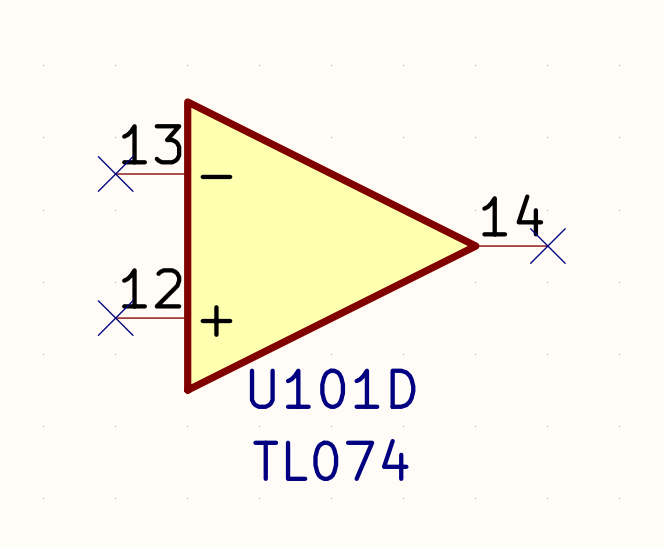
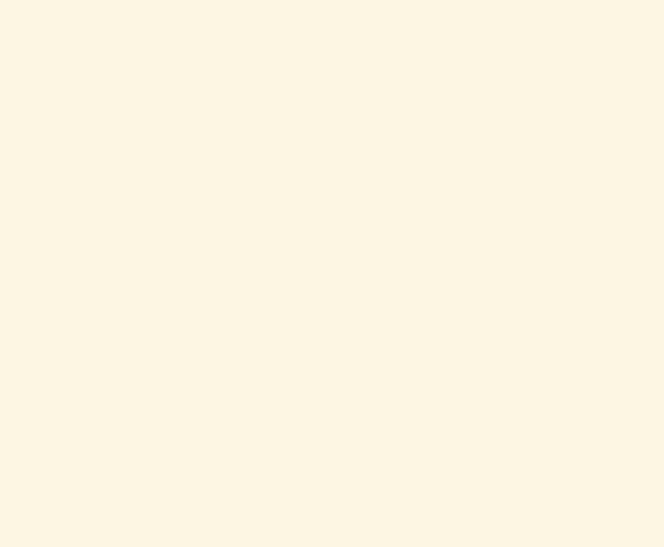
no-connect mark: (115, 174) -> none
U101D: TL074 (331, 246) -> none
no-connect mark: (547, 246) -> none
no-connect mark: (115, 318) -> none

